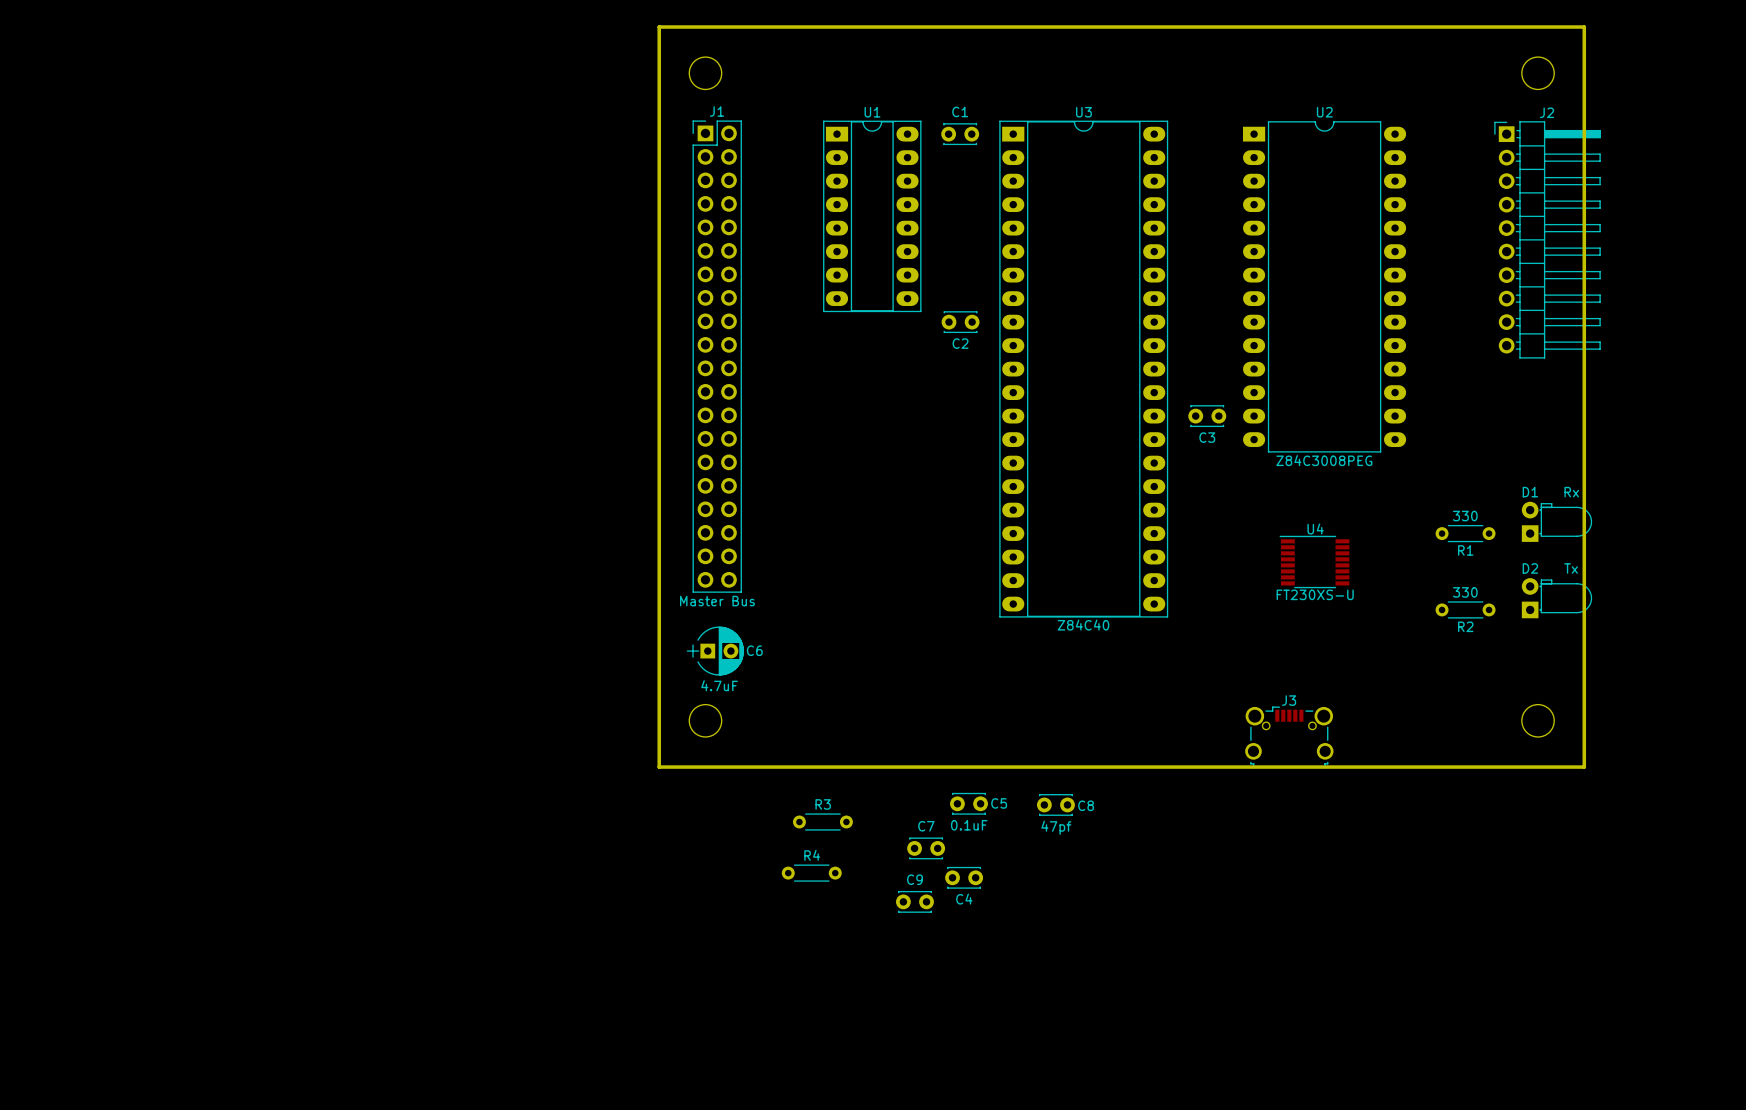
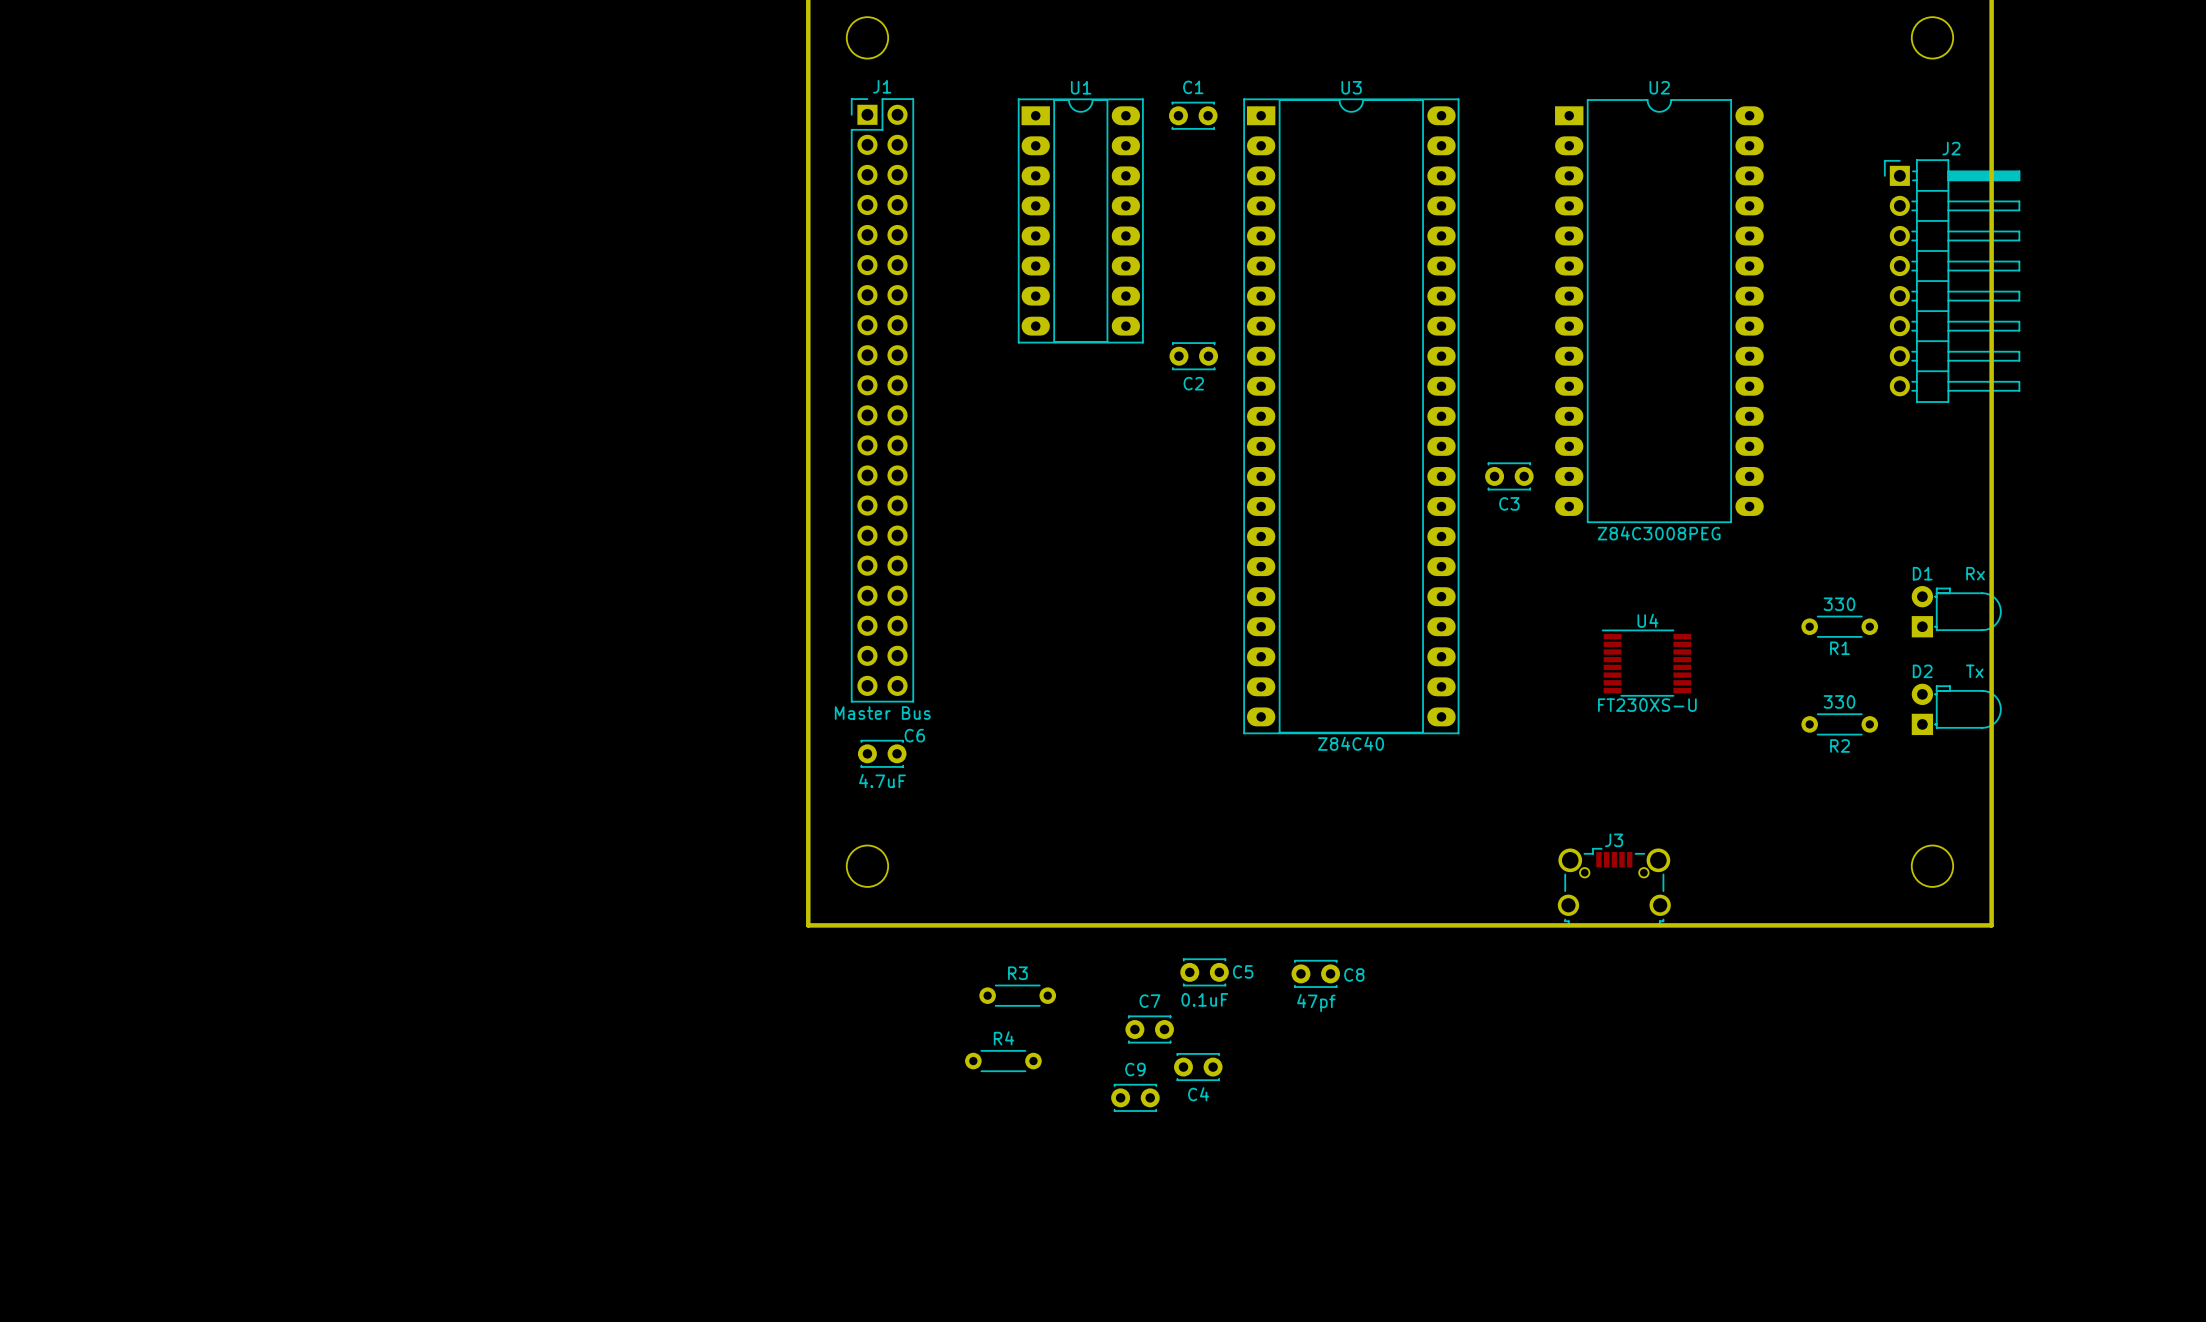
J2 name position: J2 (1547, 112) -> J2 (1951, 148)
J2 footprint: [1494, 121, 1601, 359] -> [1884, 159, 2021, 403]
C6 footprint: [686, 626, 744, 676] -> [857, 739, 907, 768]
C6 name position: C6 (754, 650) -> C6 (914, 735)

